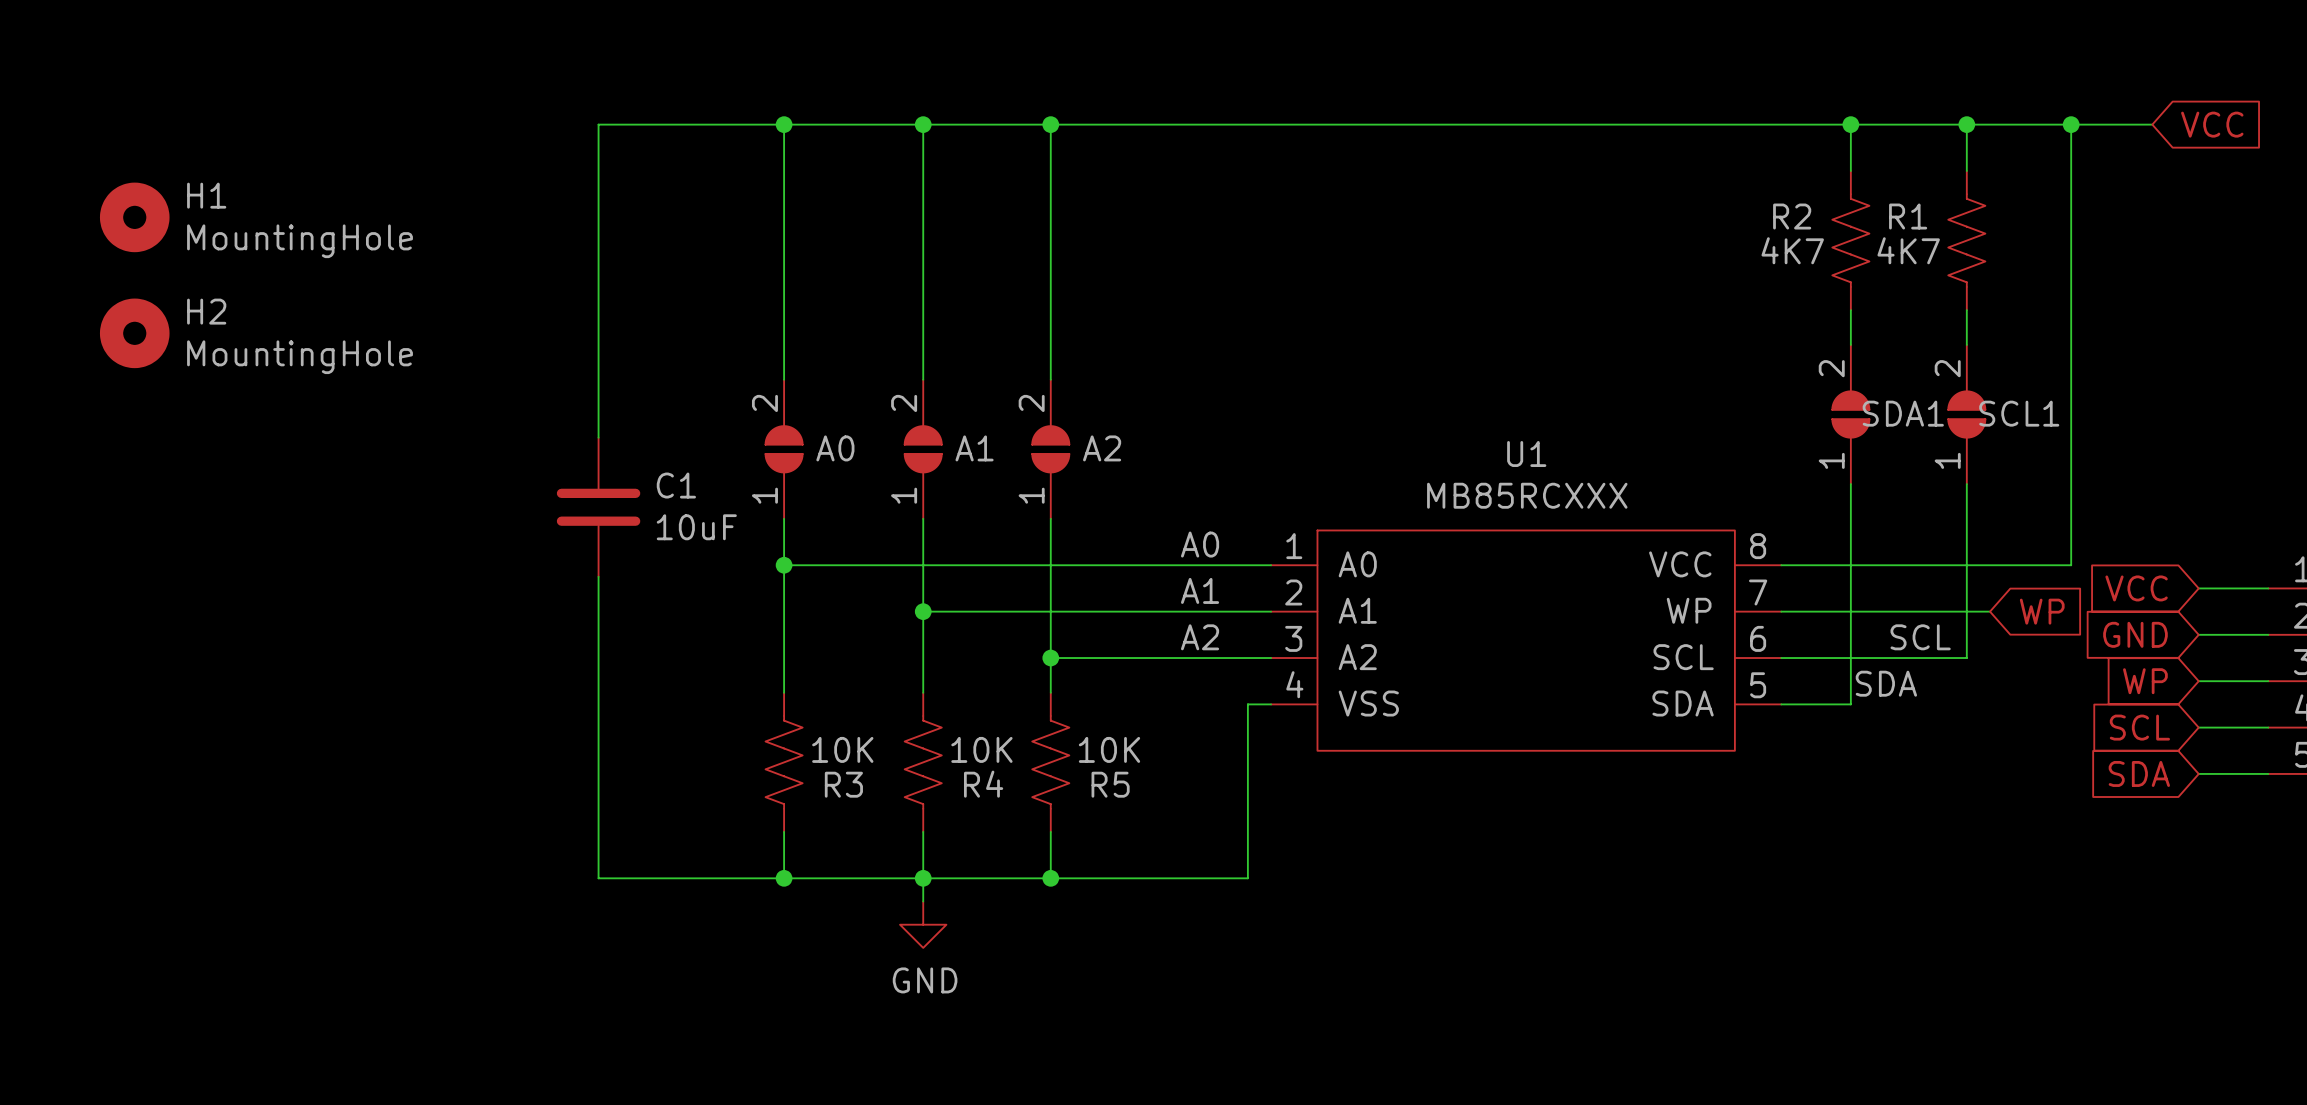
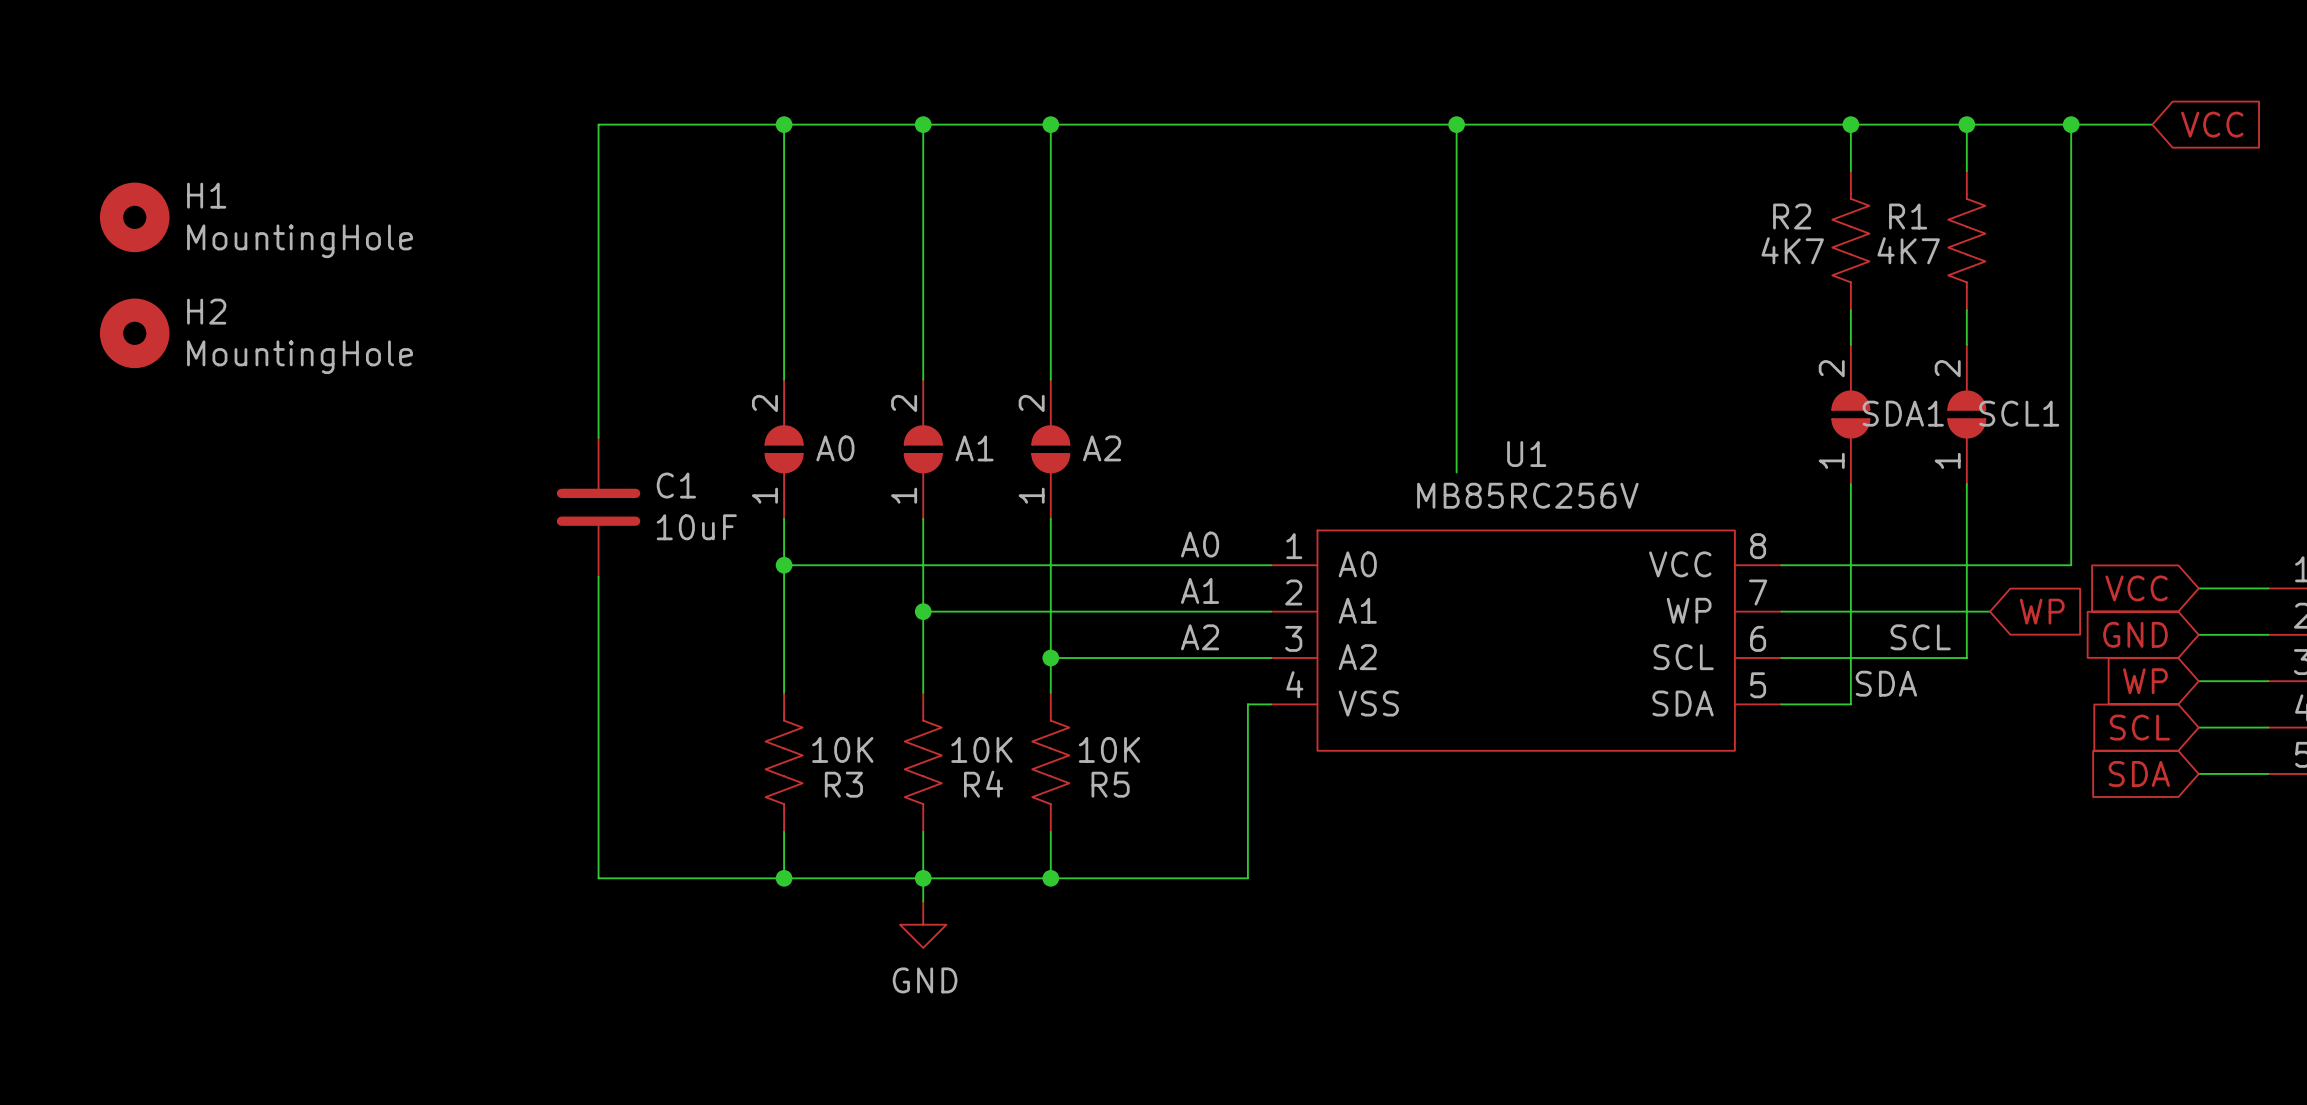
wire: none -> (1456, 124) (1456, 472)
junction: none -> (1456, 124)
U1 value: MB85RCXXX (1527, 495) -> MB85RC256V (1527, 495)

